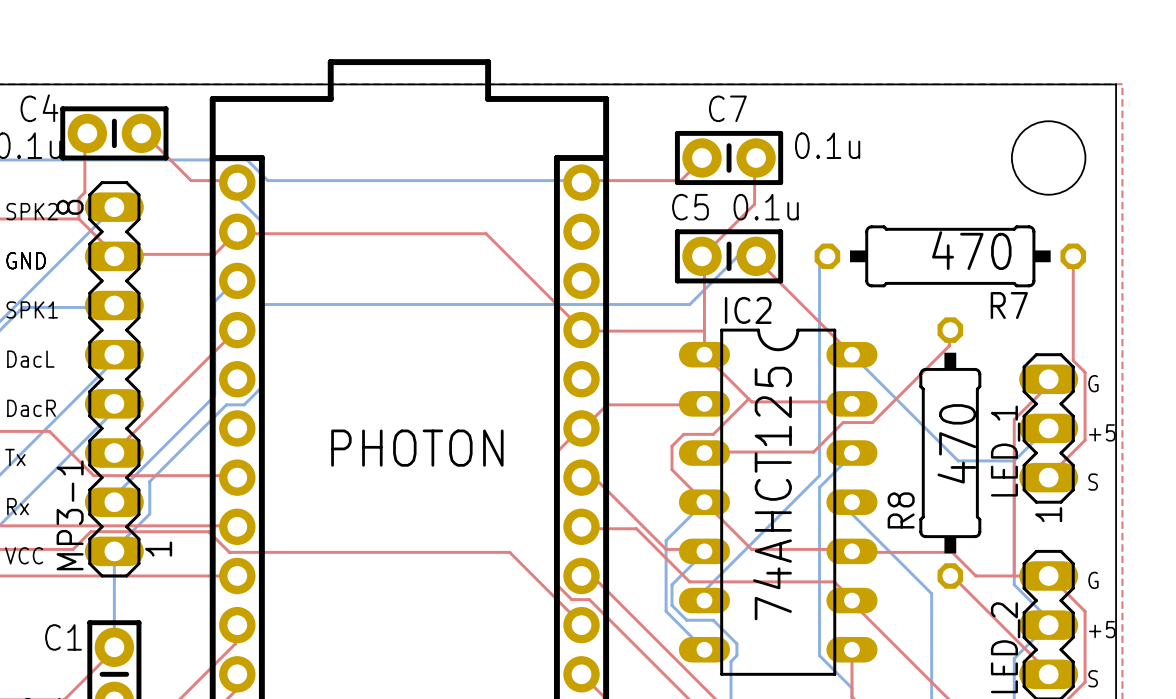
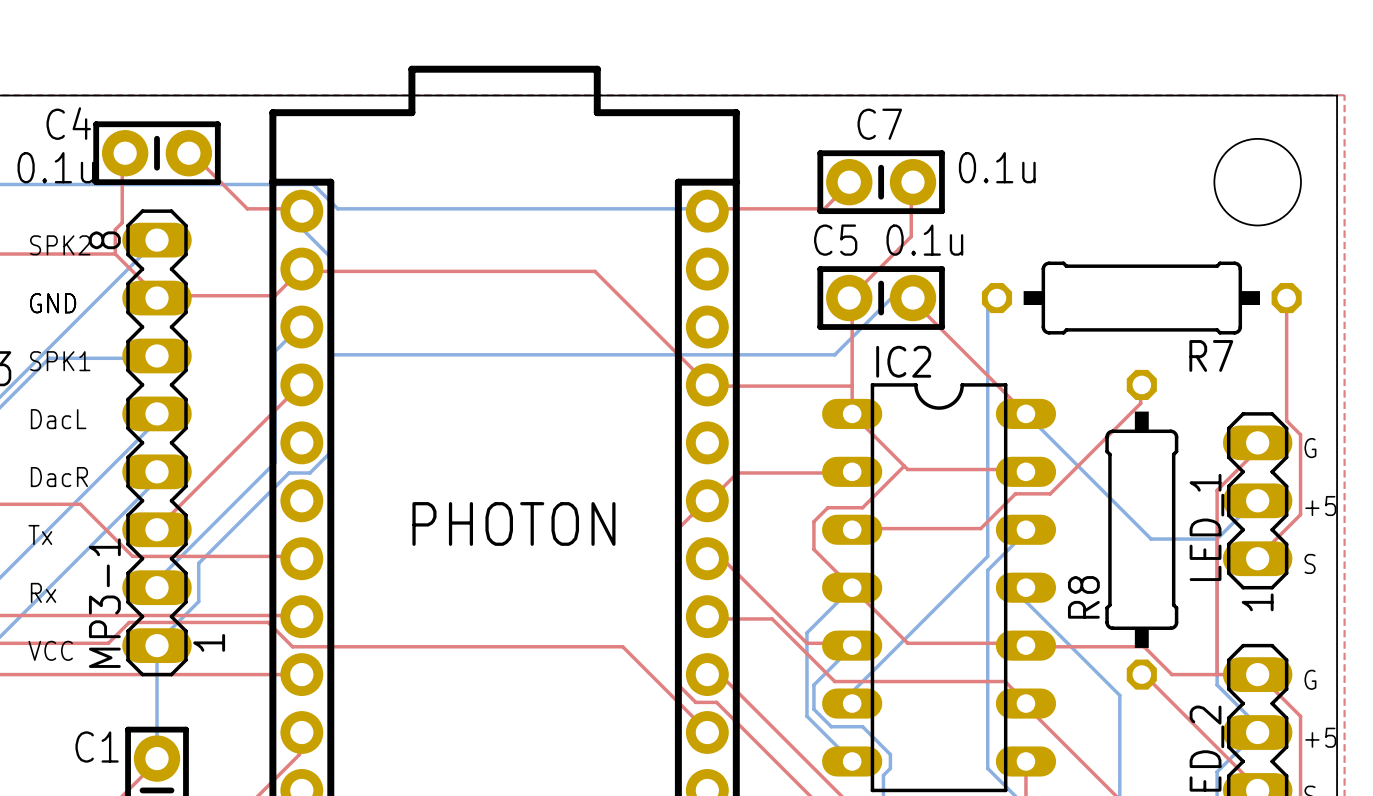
text: 470 (971, 250) -> none
text: 470 (956, 443) -> none
text: 74AHCT125 (772, 493) -> none

